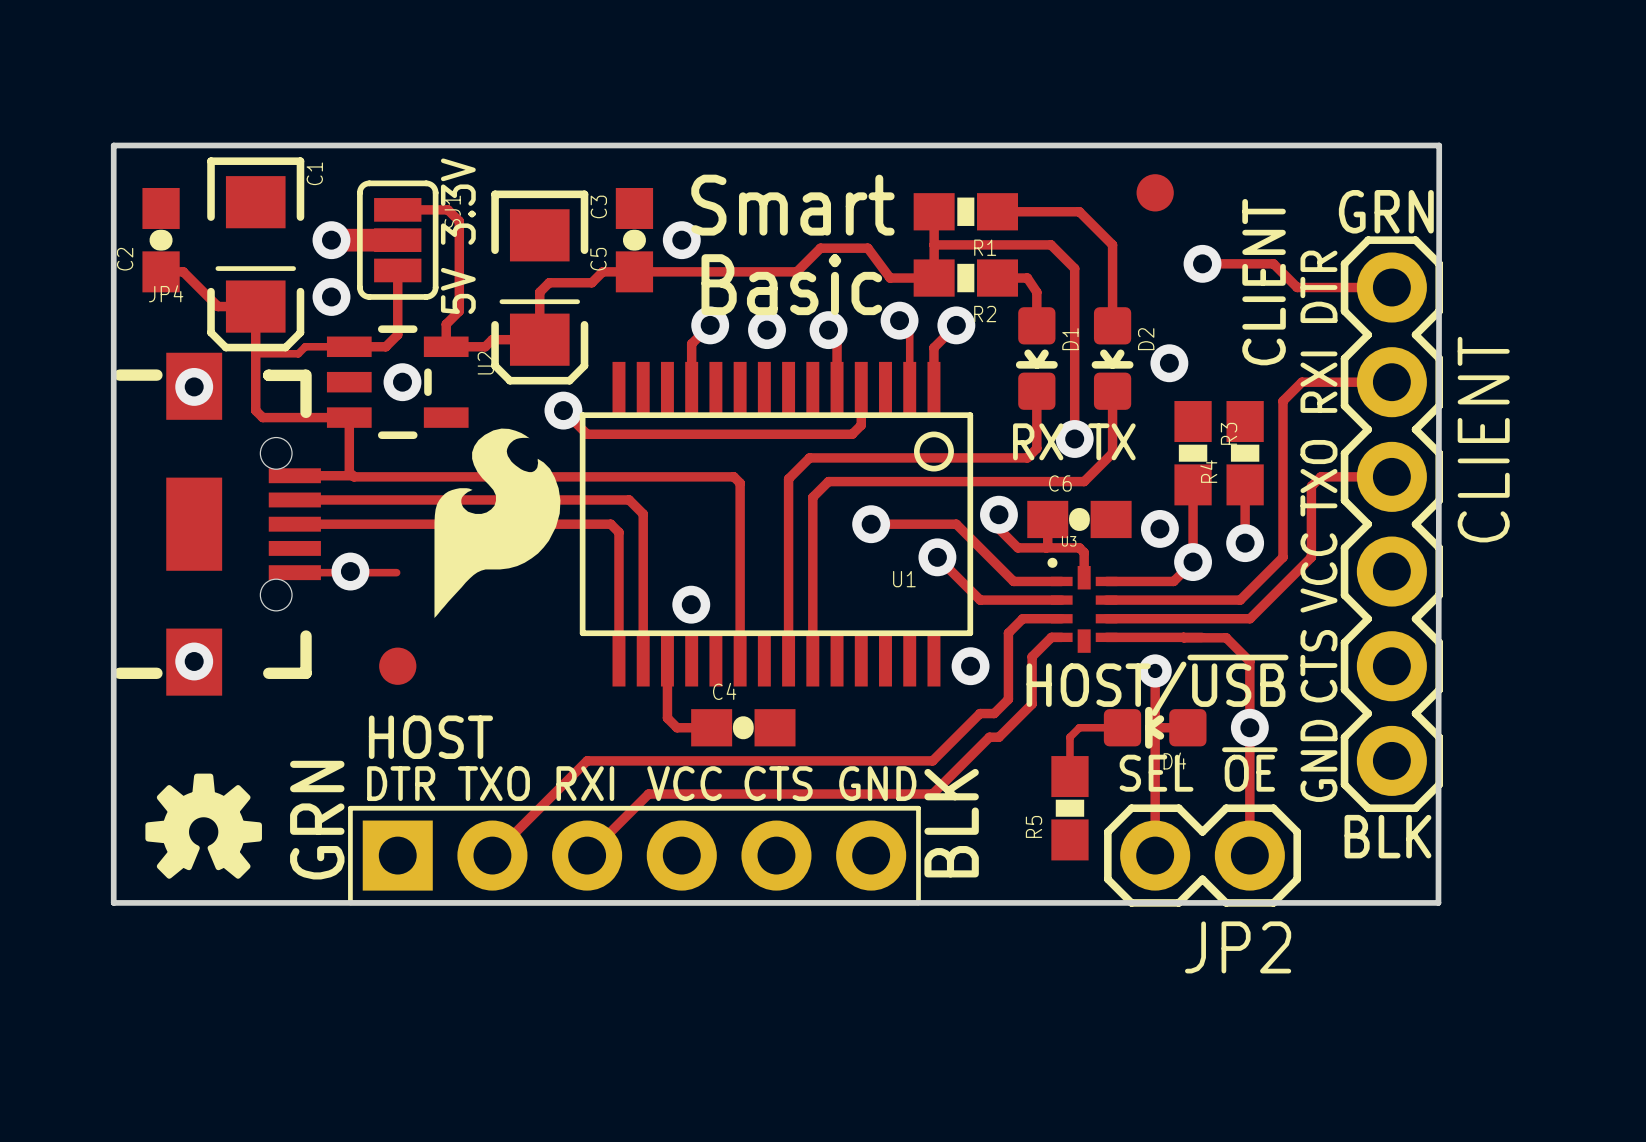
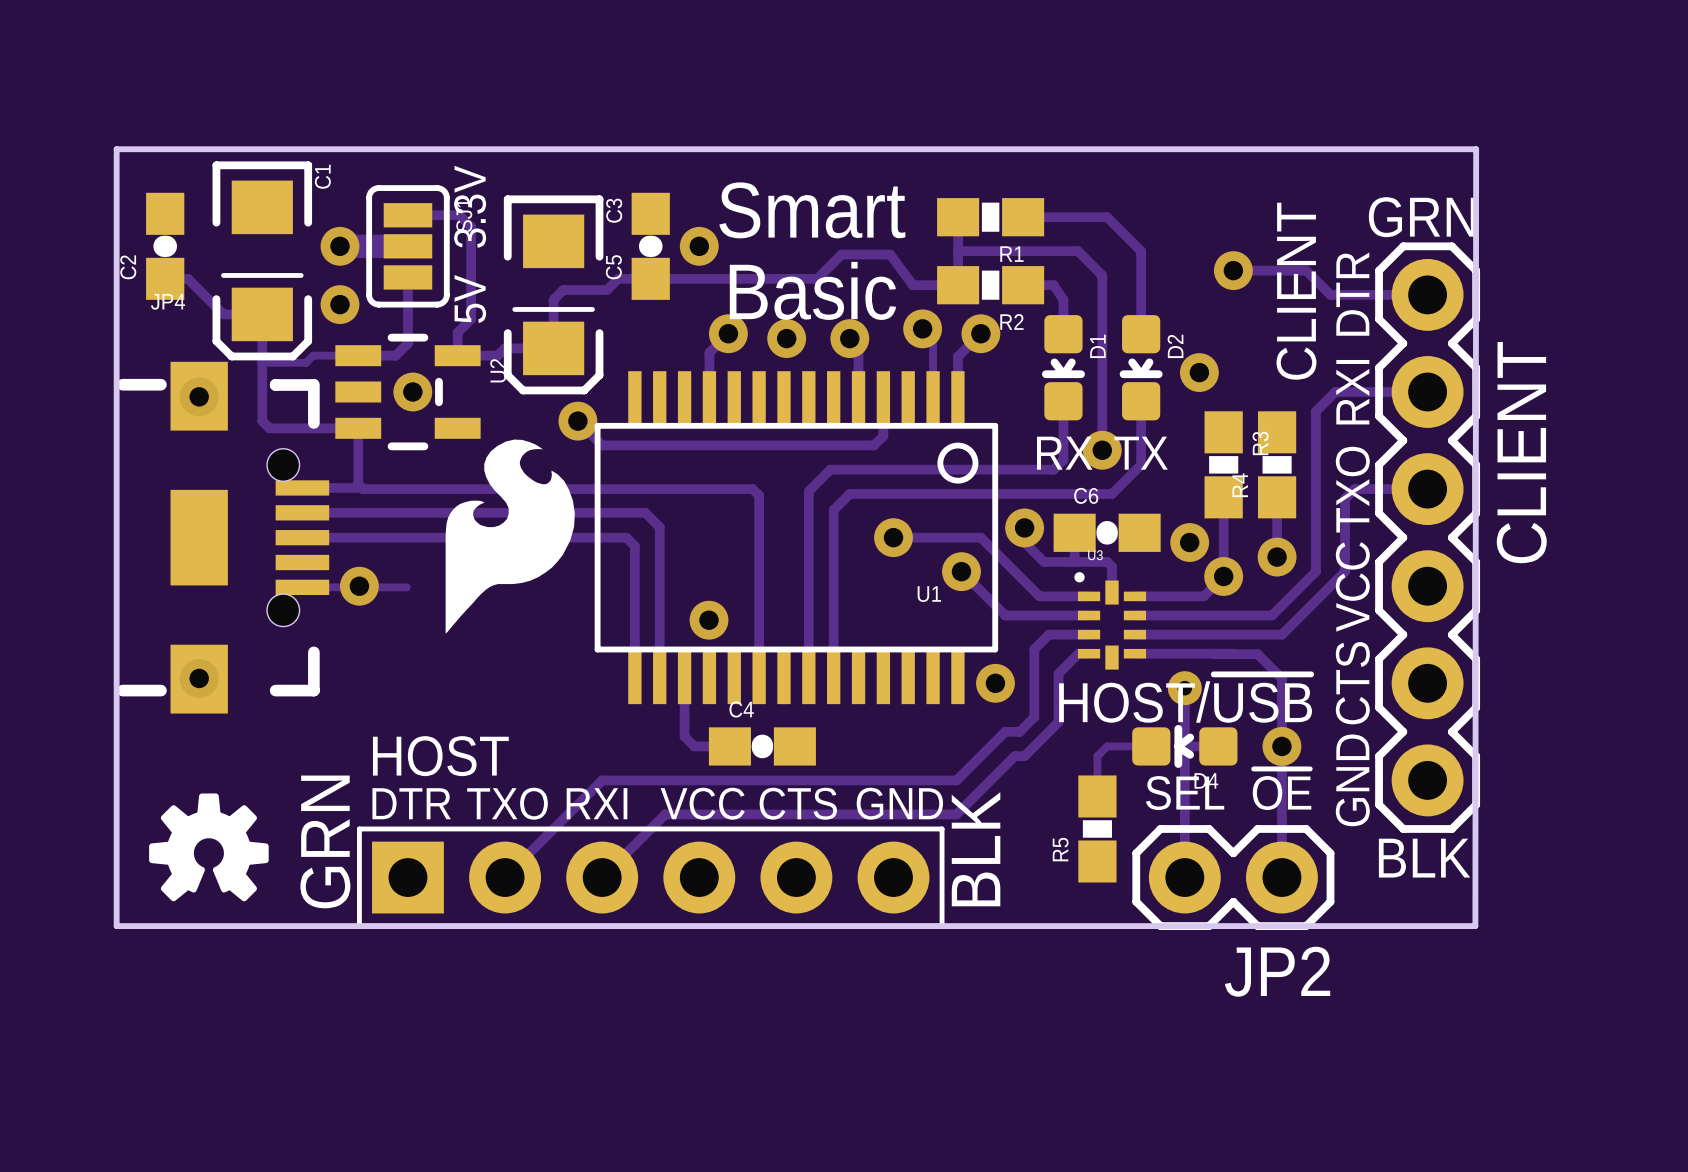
part: (1155, 192) -> none
part: (397, 666) -> none

